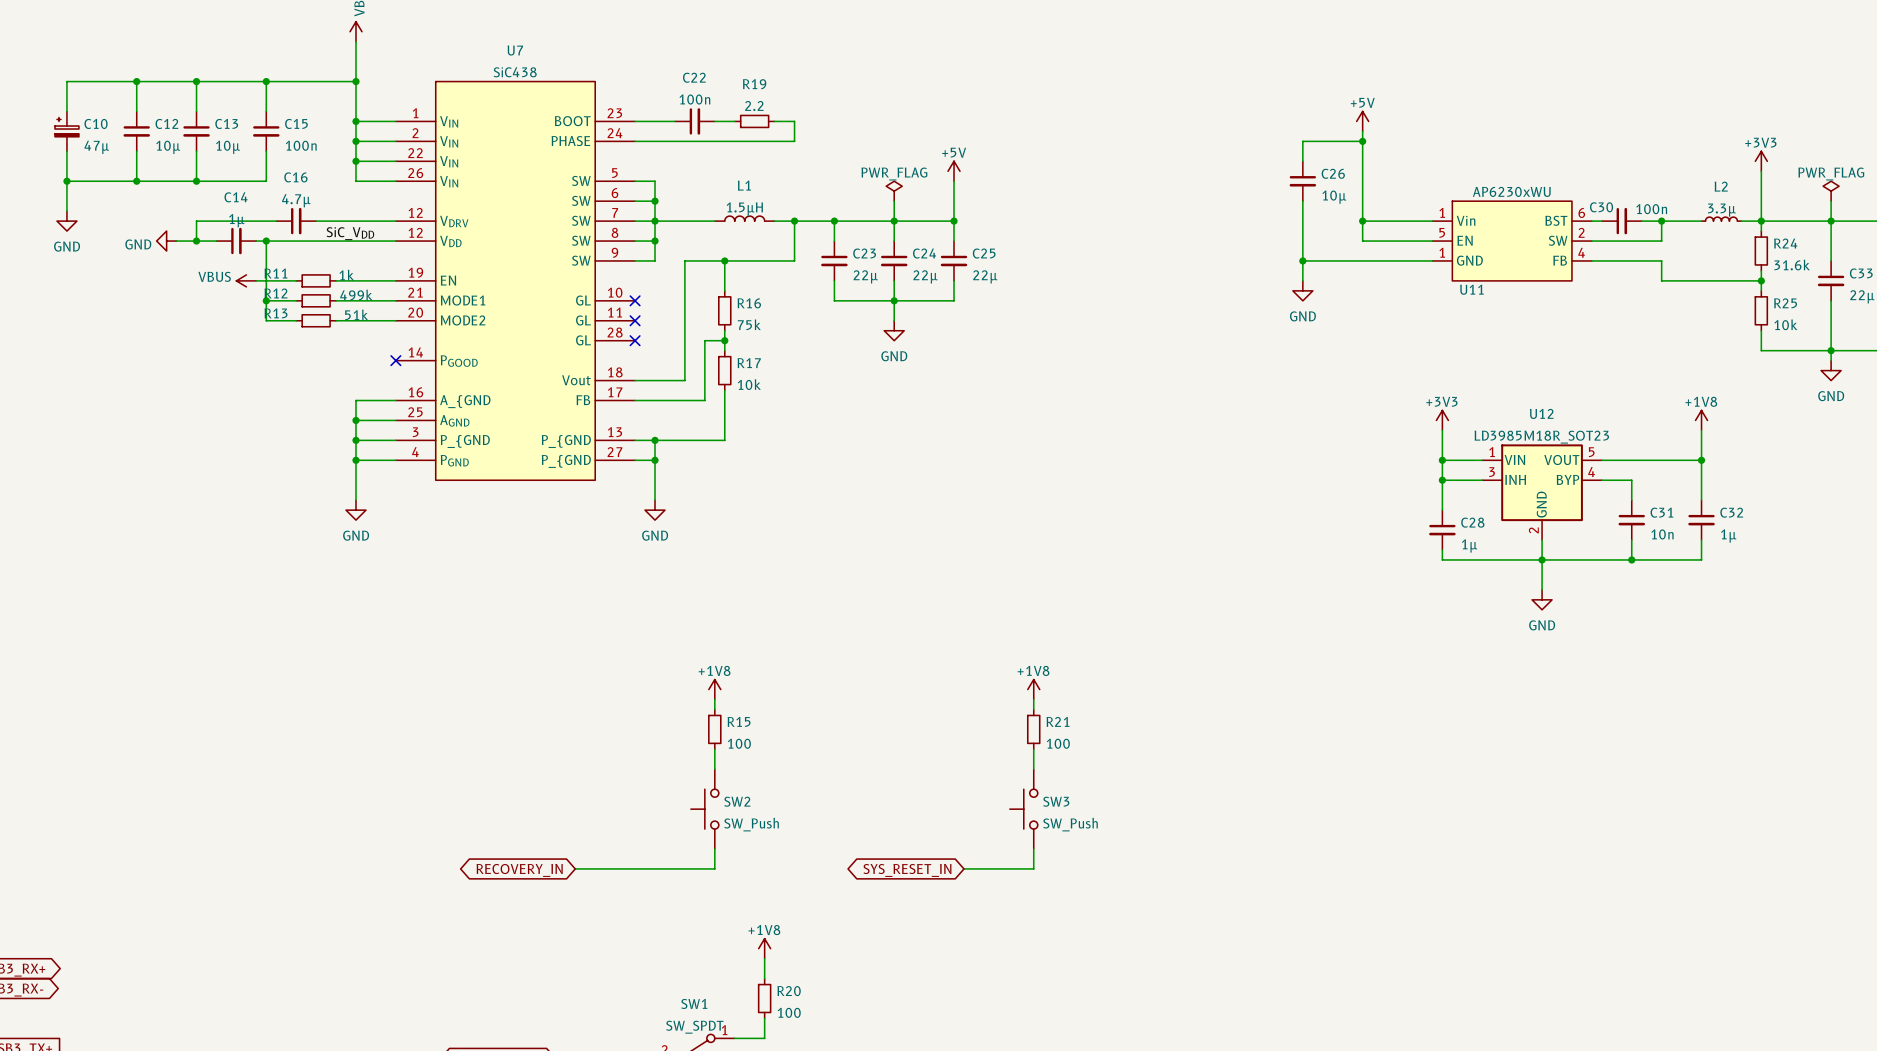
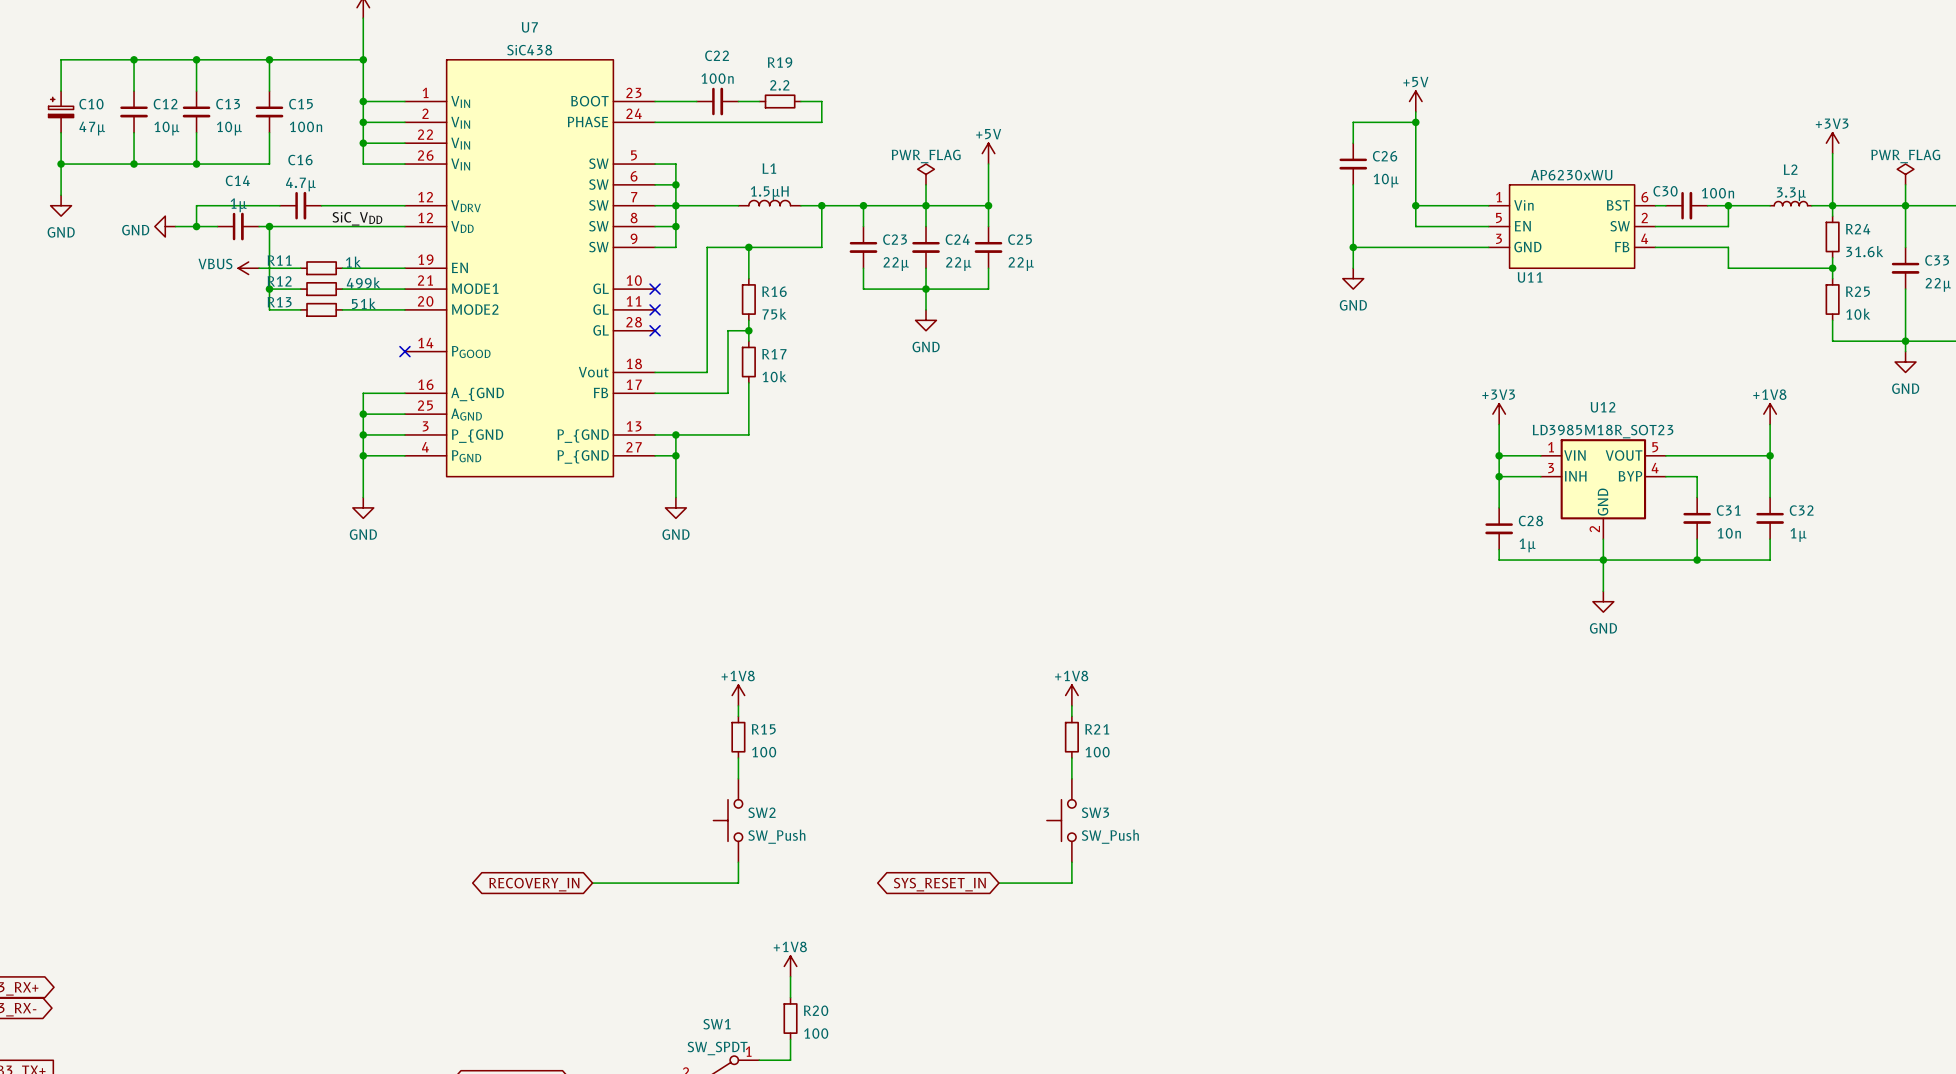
U11 pin number: 1 (1442, 252) -> 3 (1499, 238)

